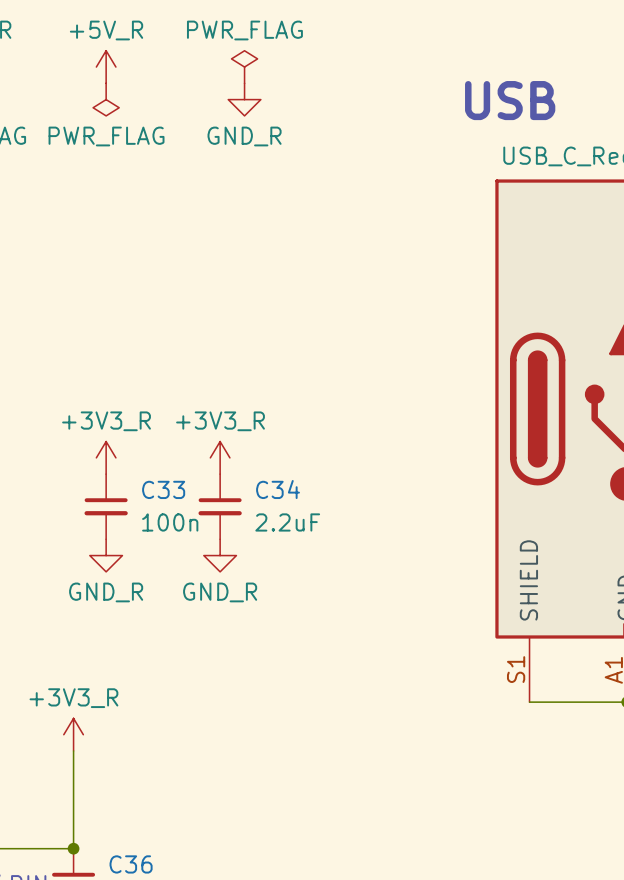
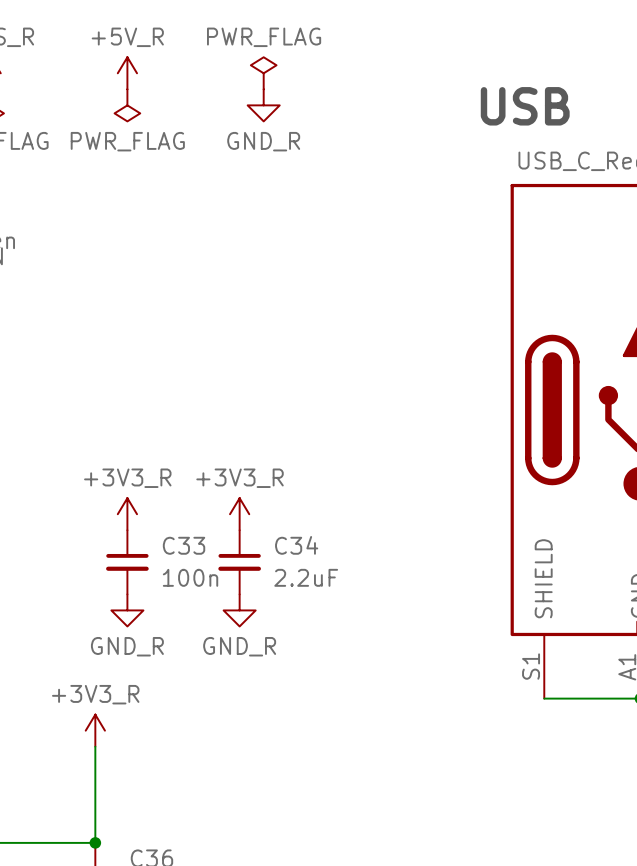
power symbol position: +3V3_R (106, 457) -> +3V3_R (127, 514)
power symbol position: +3V3_R (220, 457) -> +3V3_R (239, 514)
C33 position: (106, 506) -> (127, 562)
C34 position: (220, 506) -> (239, 562)
power symbol position: GND_R (106, 555) -> GND_R (127, 610)
power symbol position: GND_R (220, 555) -> GND_R (239, 610)

